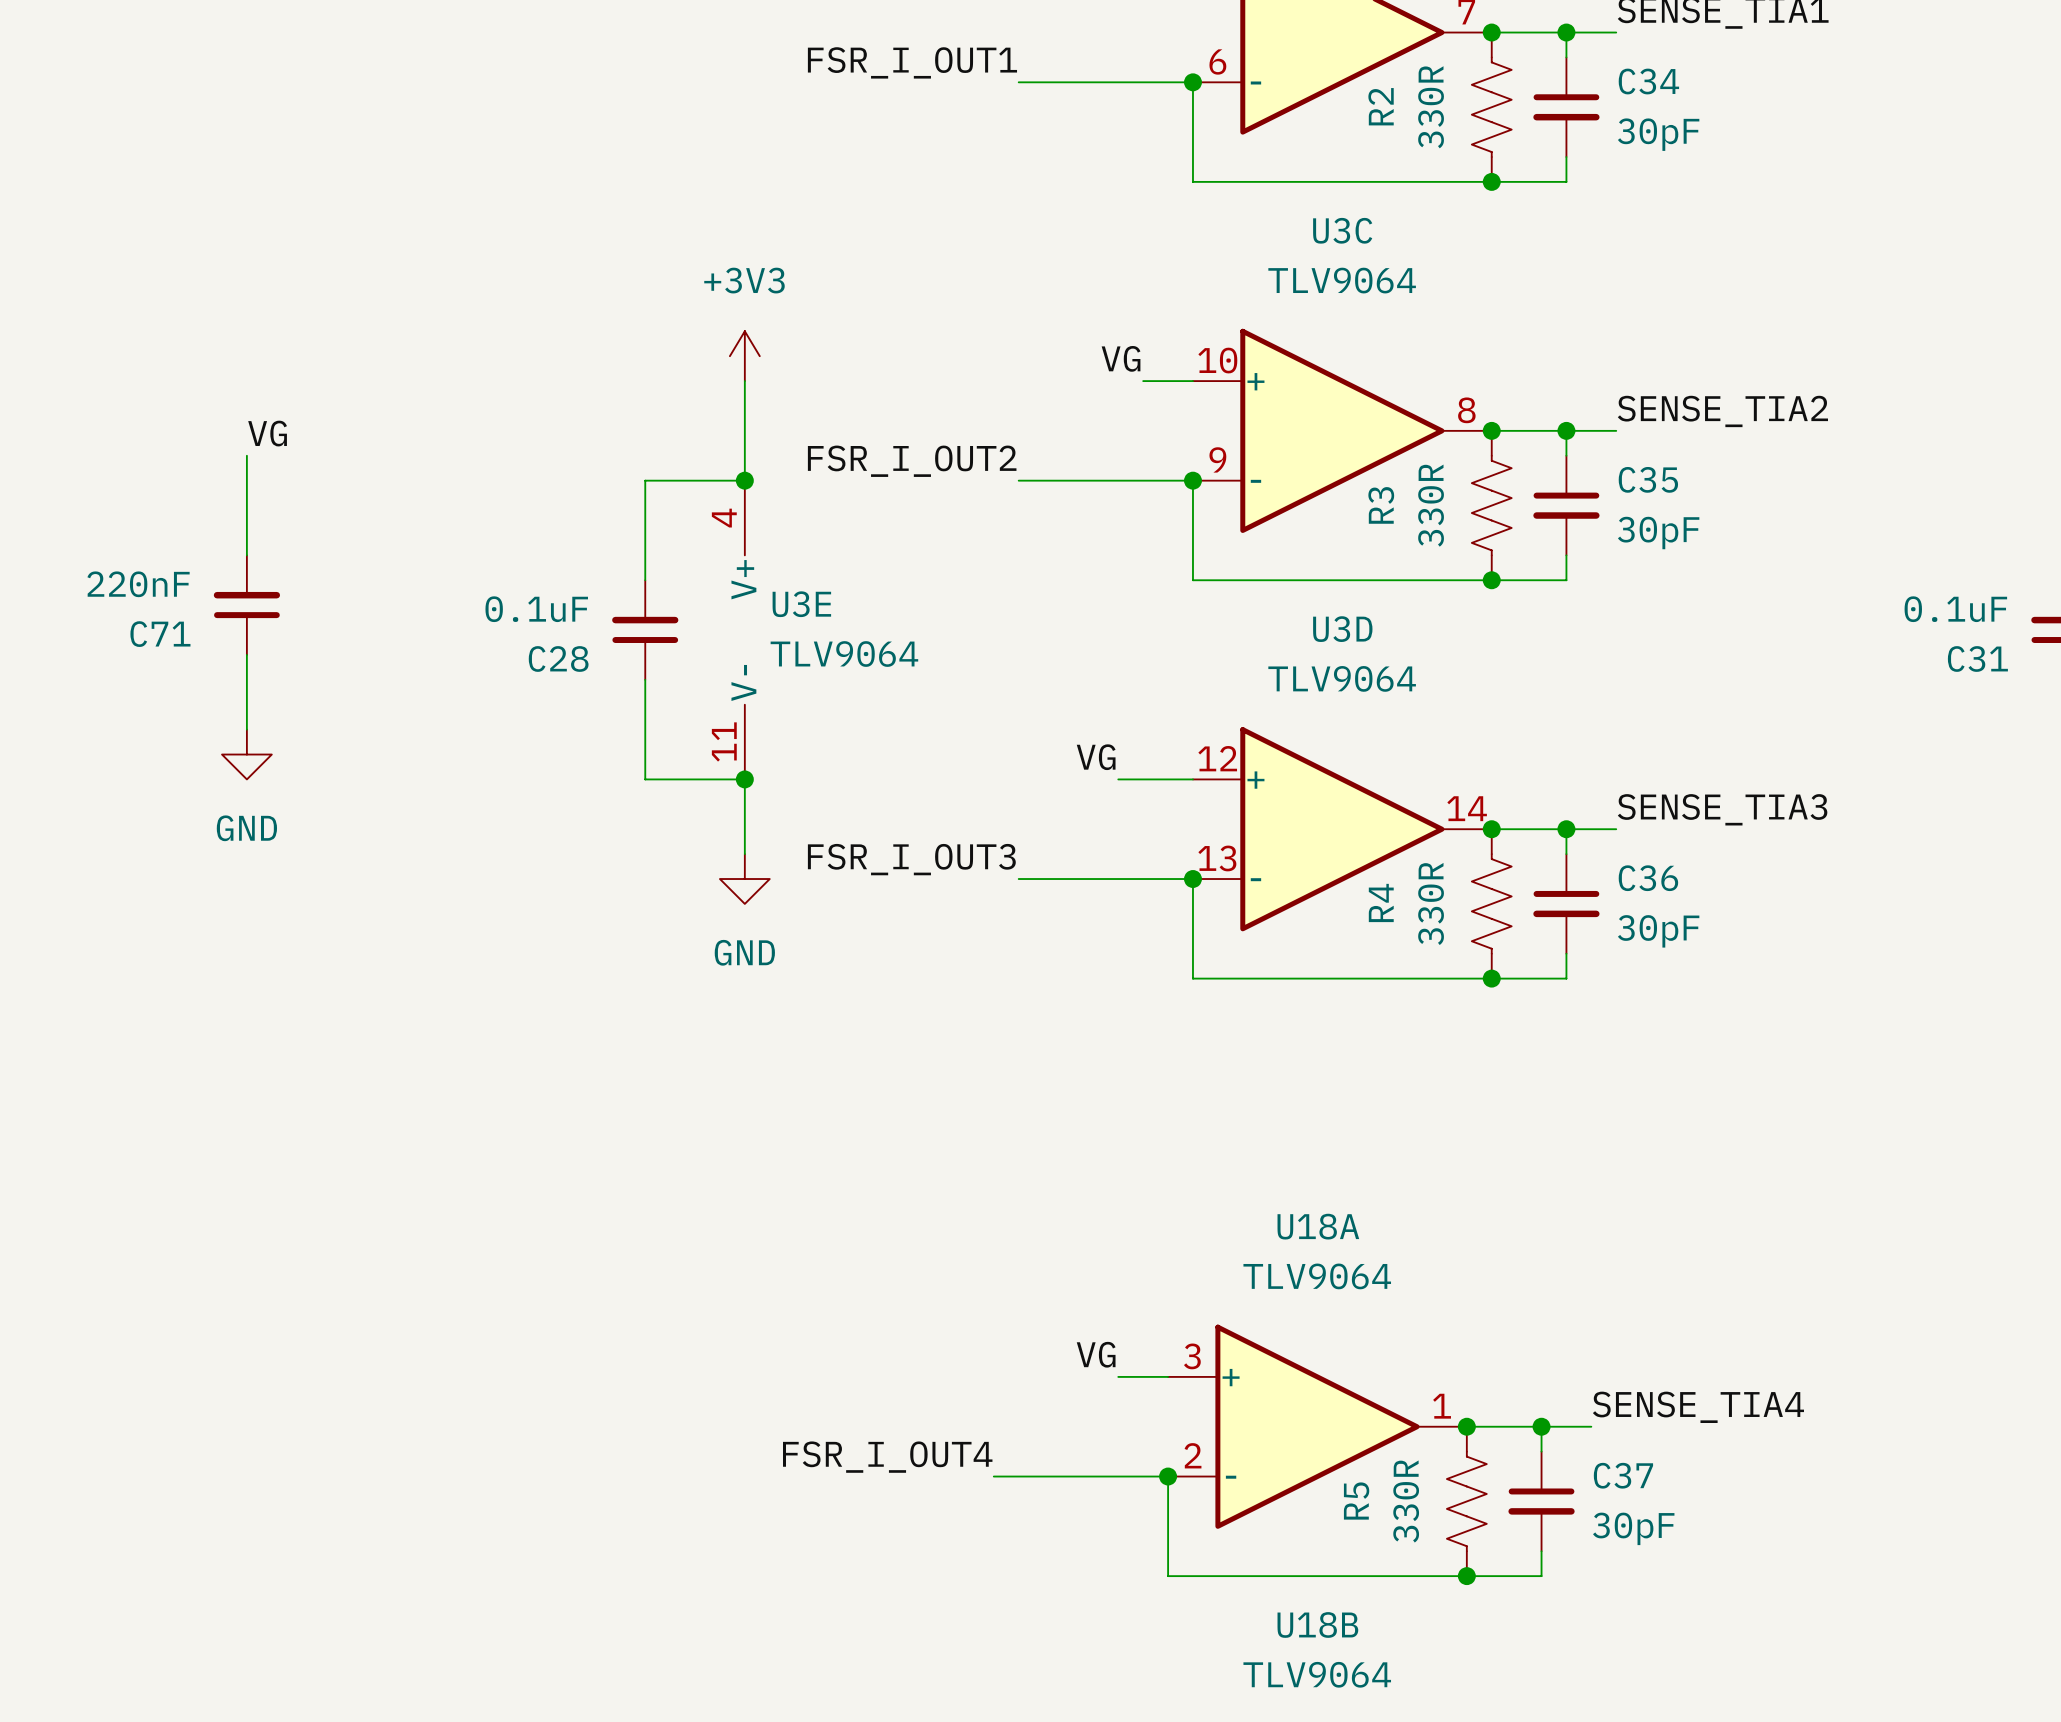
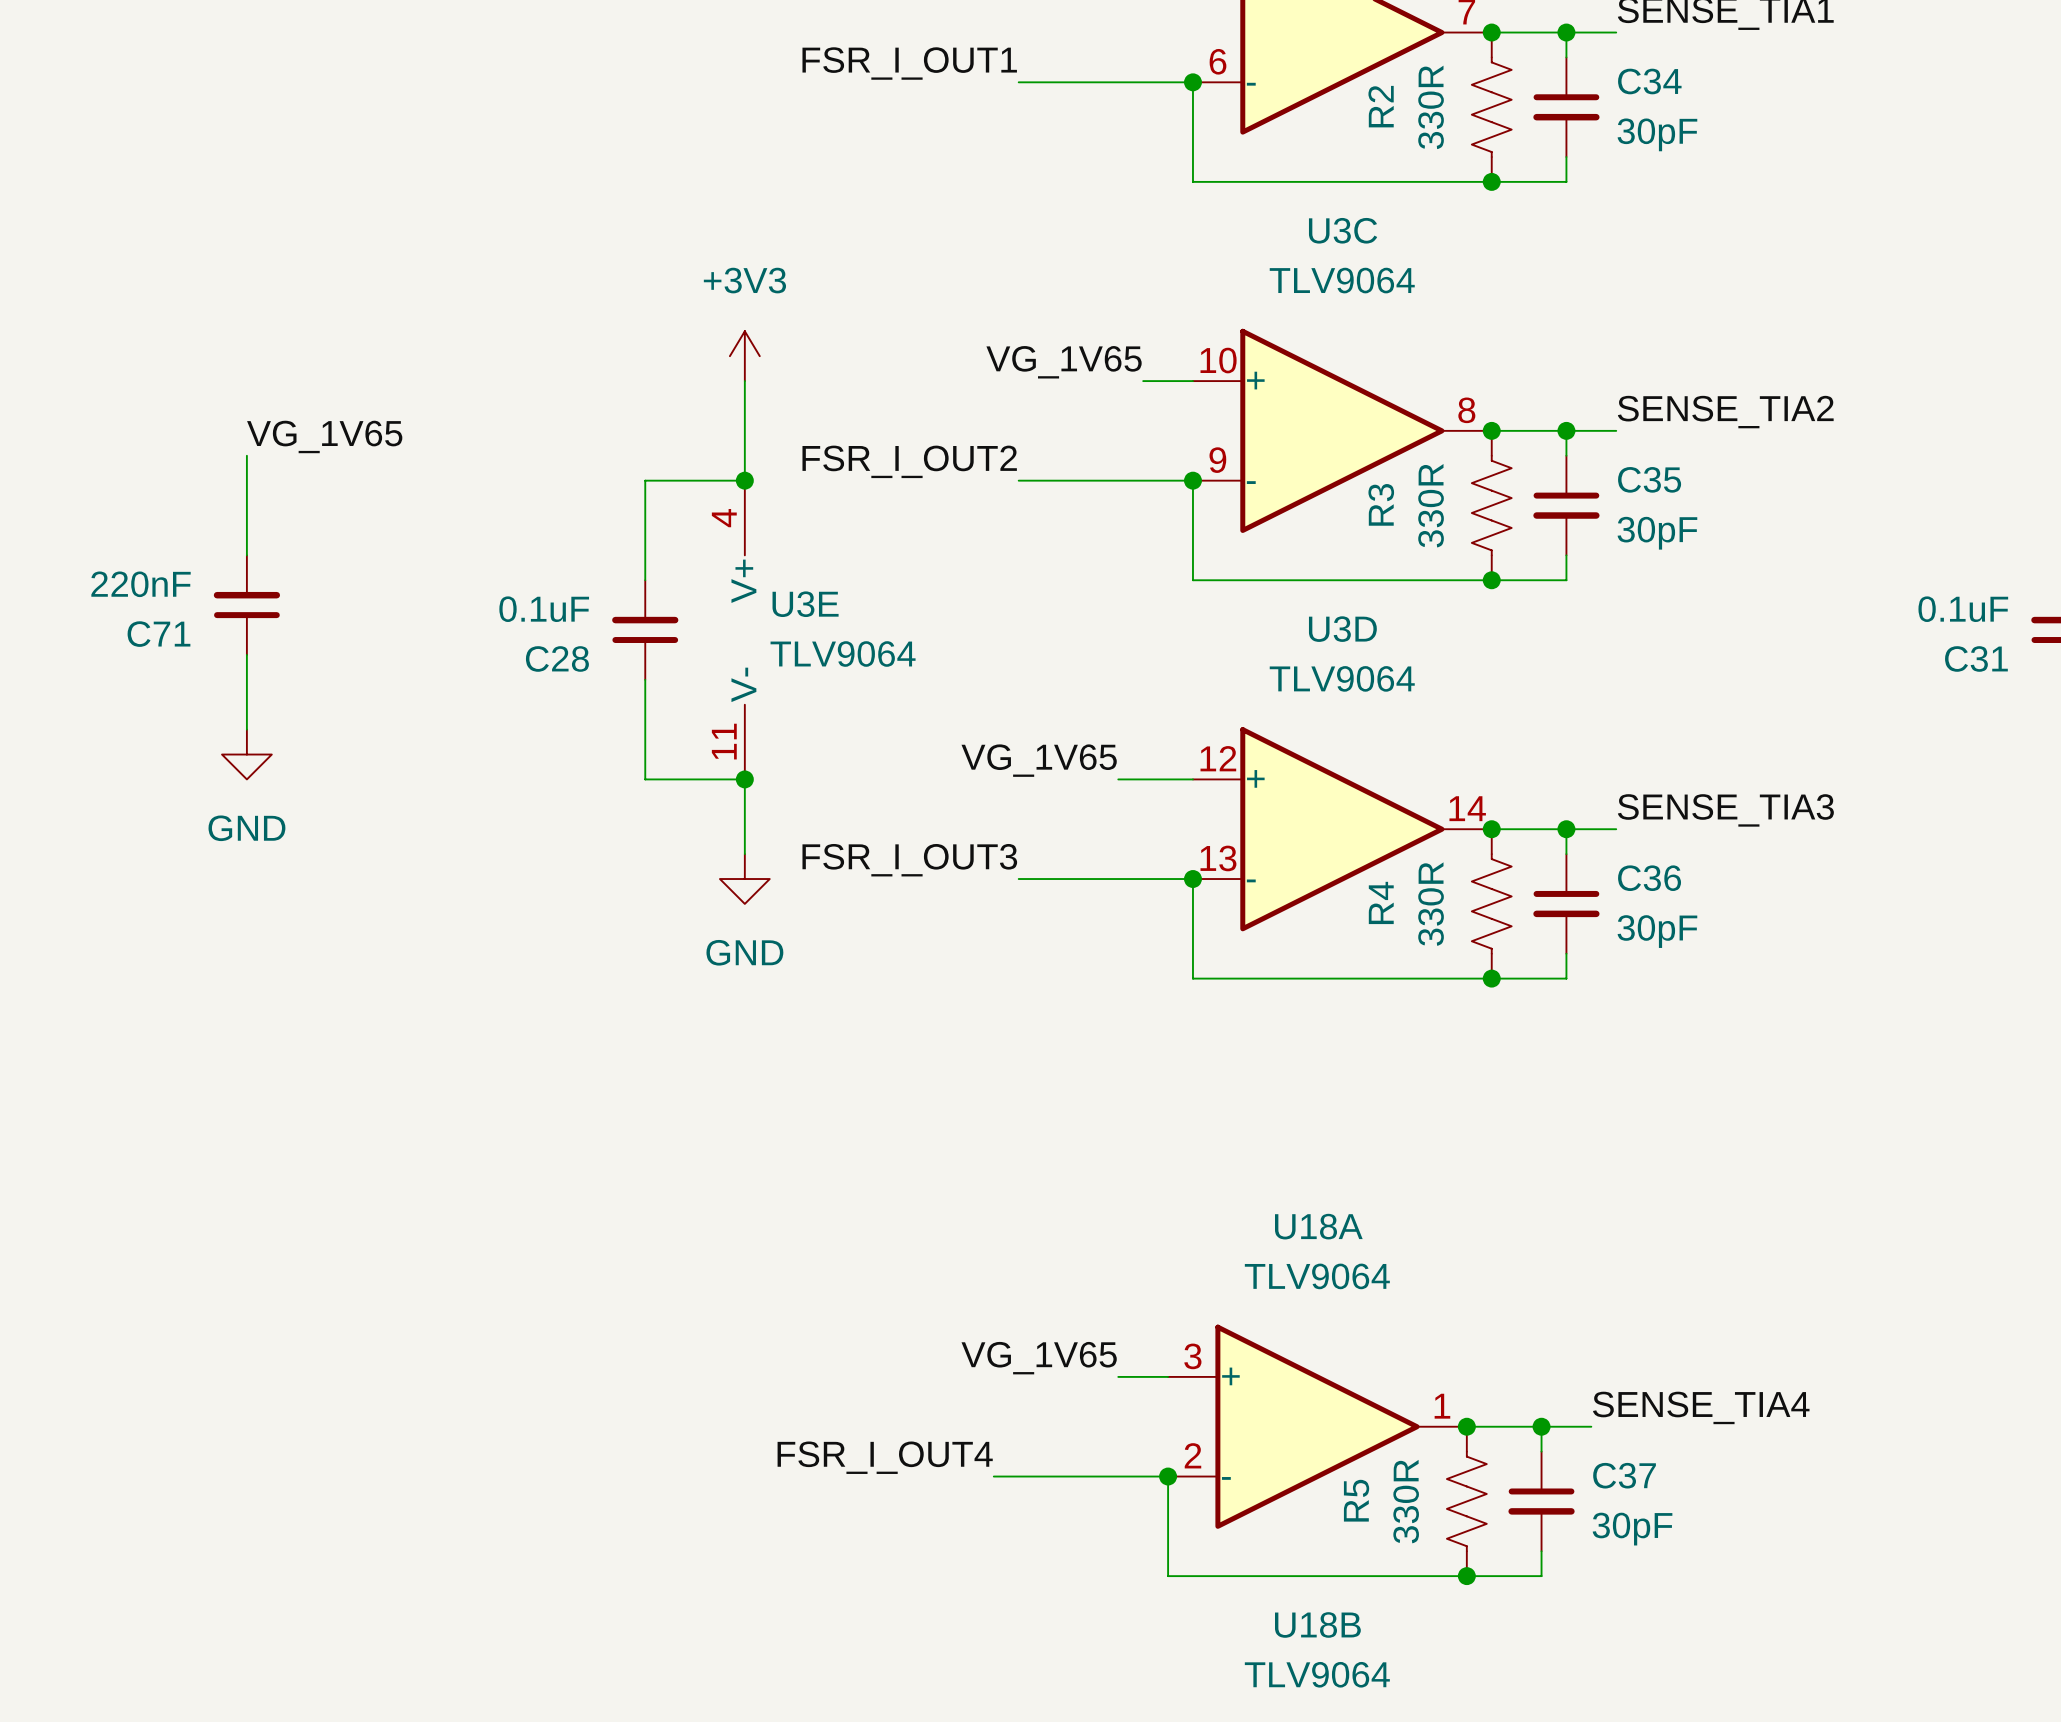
label: VG (1121, 358) -> VG_1V65 (1064, 362)
label: VG (267, 433) -> VG_1V65 (324, 436)
label: VG (1096, 757) -> VG_1V65 (1039, 760)
label: VG (1096, 1354) -> VG_1V65 (1039, 1358)

